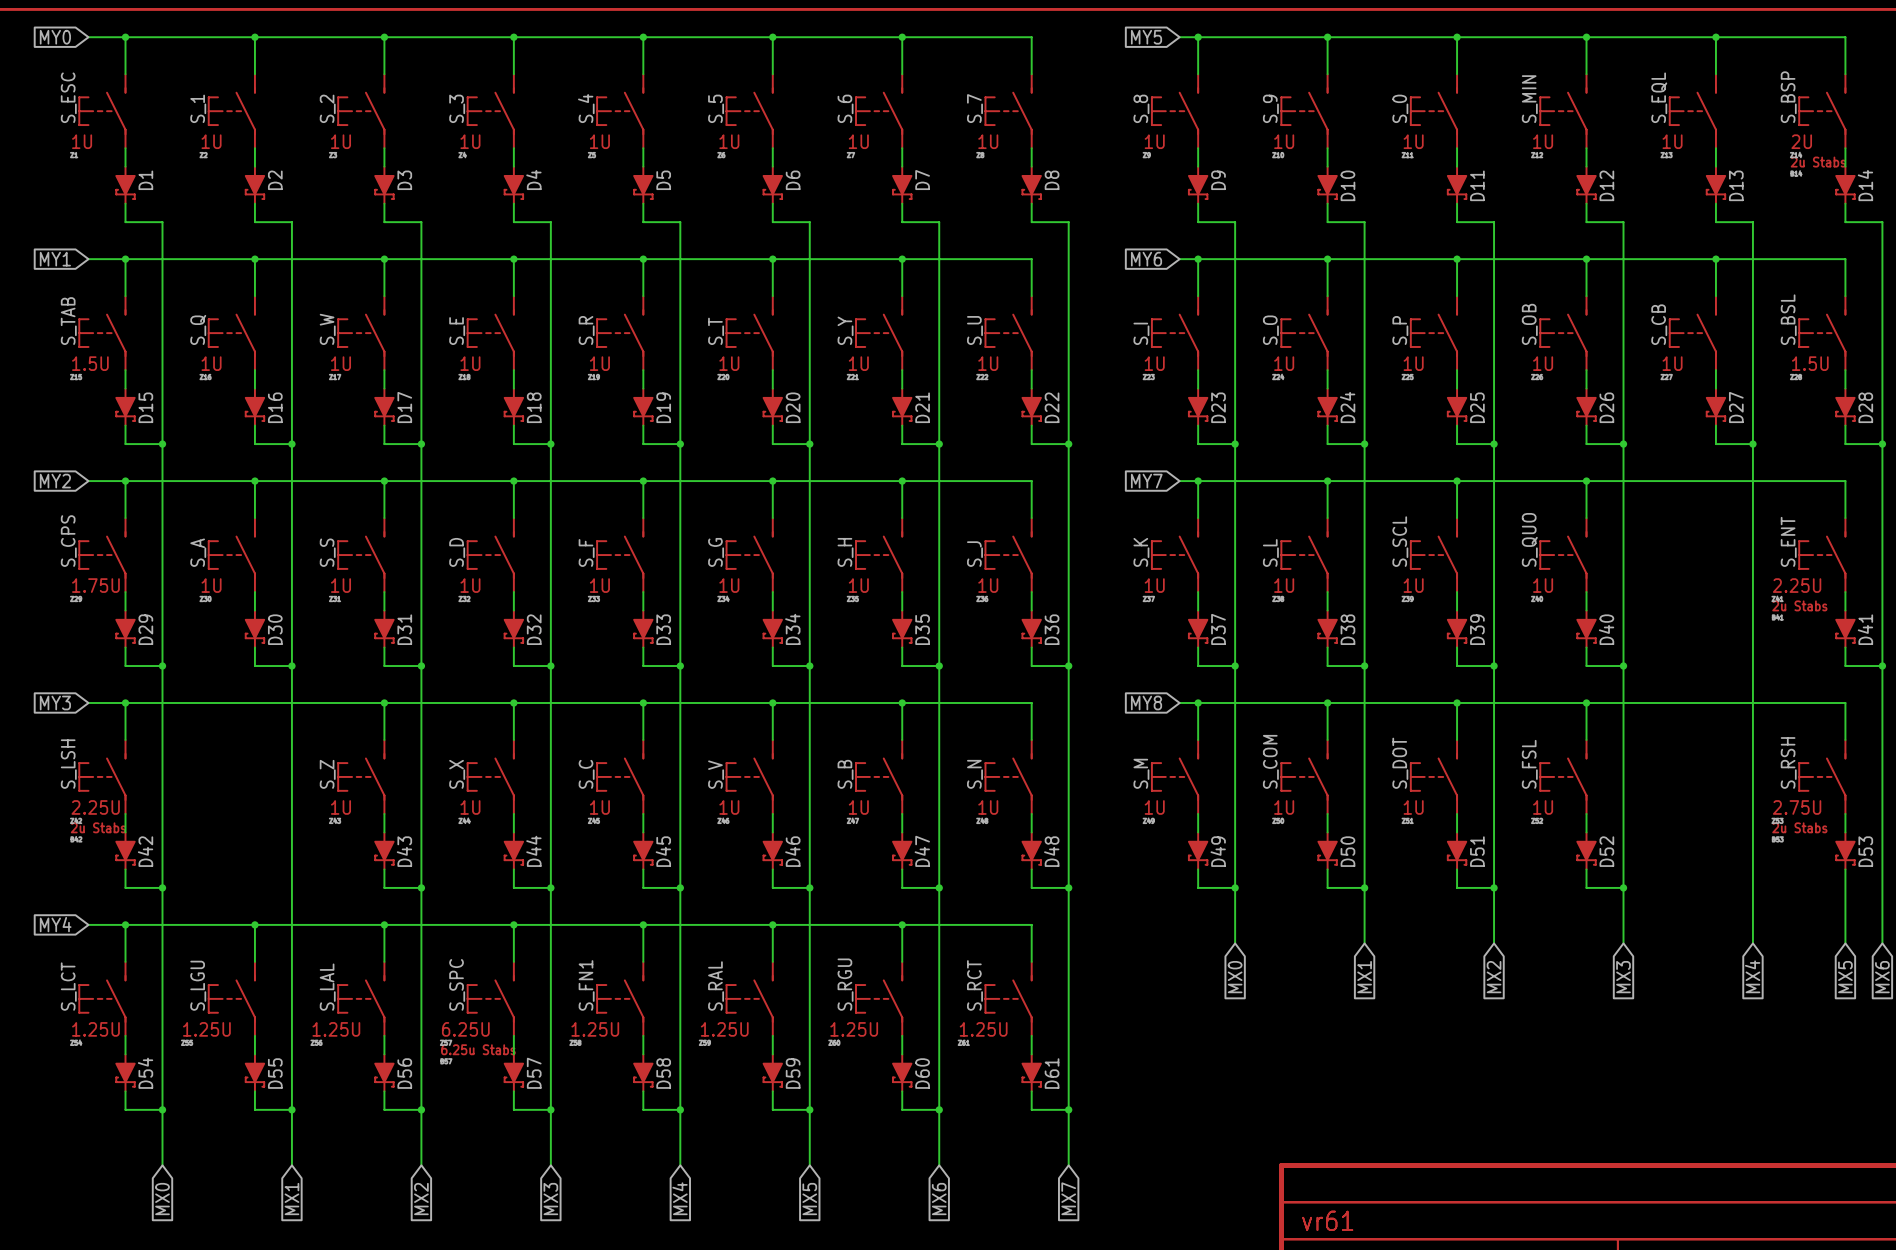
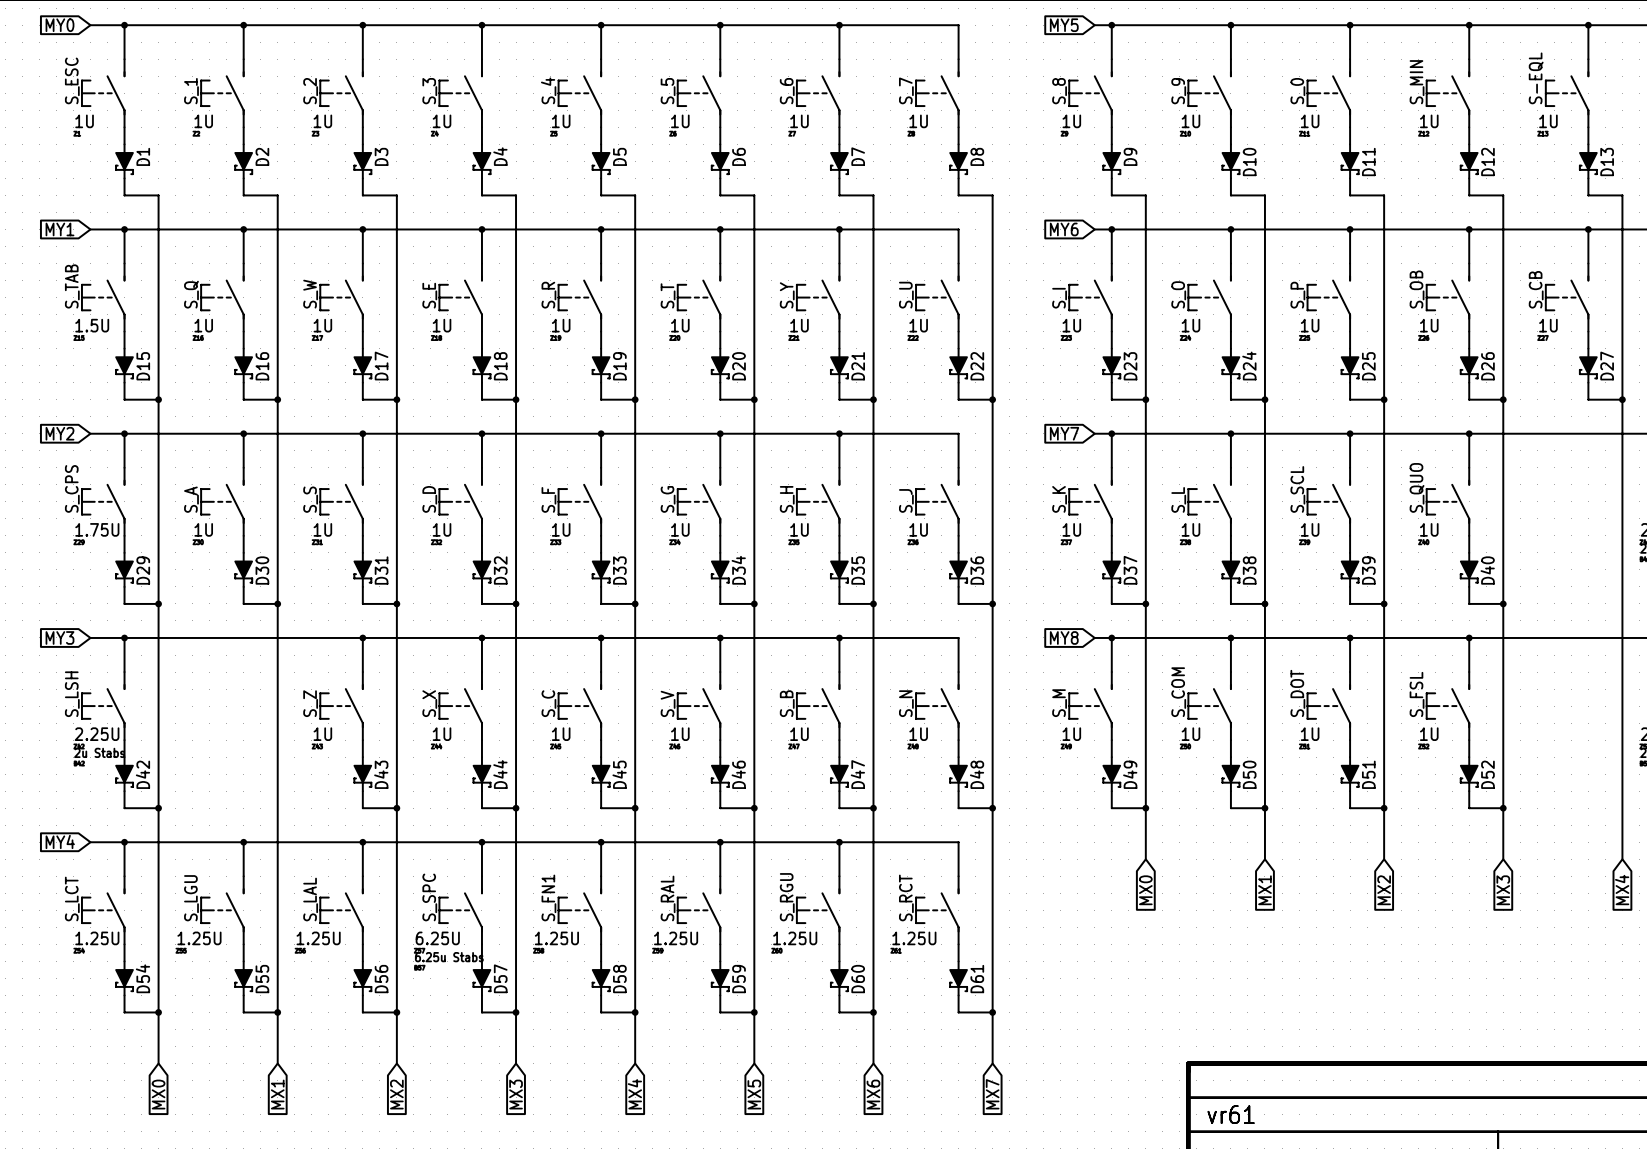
S_EQL name: S_EQL (1659, 97) -> S-EQL (1536, 78)

